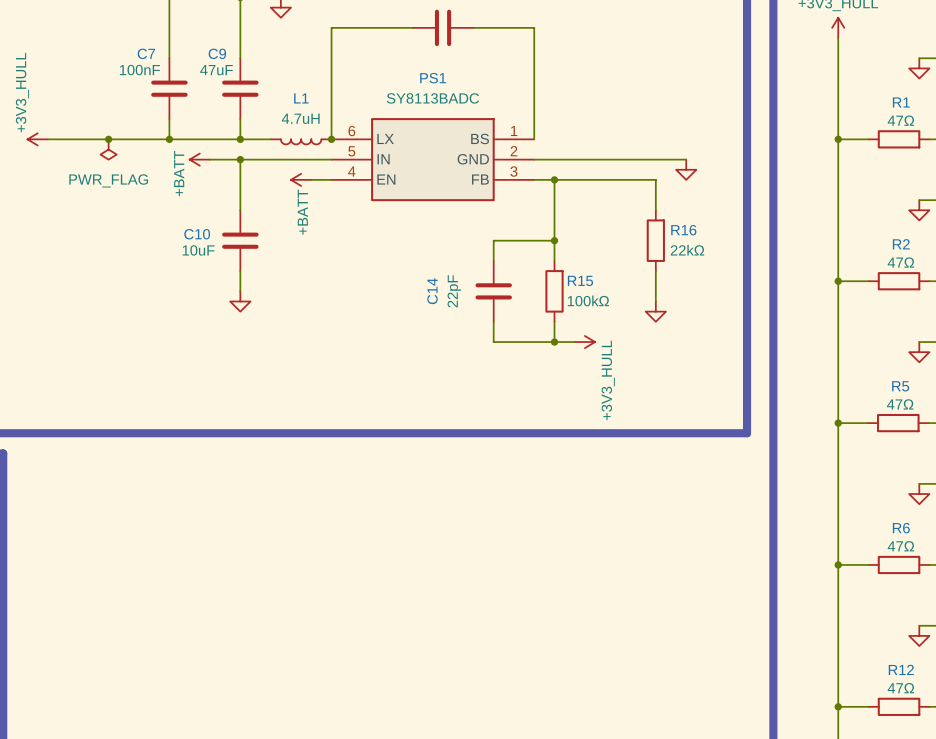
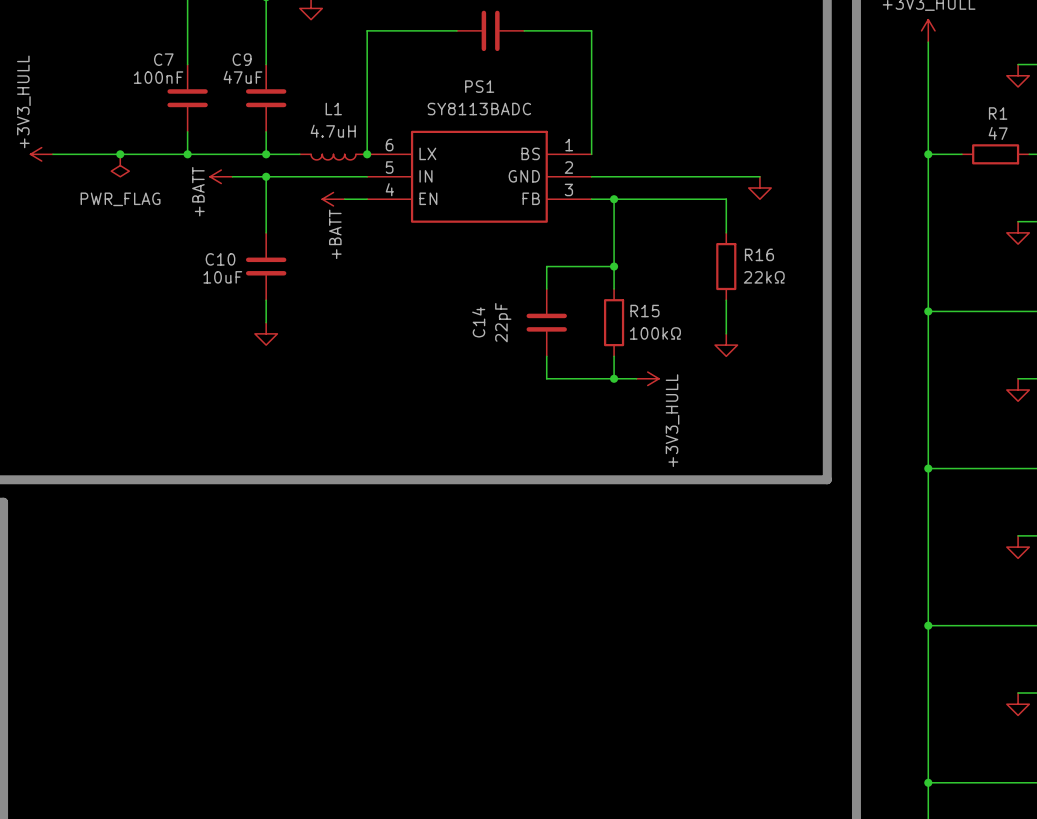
R1 value: 47Ω (900, 120) -> 47 (998, 133)
wire: none -> (961, 311) (1029, 311)
R2: 47Ω (899, 281) -> none
wire: none -> (961, 468) (1028, 468)
R5: 47Ω (898, 423) -> none
wire: none -> (961, 625) (1029, 625)
R6: 47Ω (899, 564) -> none
wire: none -> (961, 782) (1029, 782)
R12: 47Ω (899, 706) -> none

